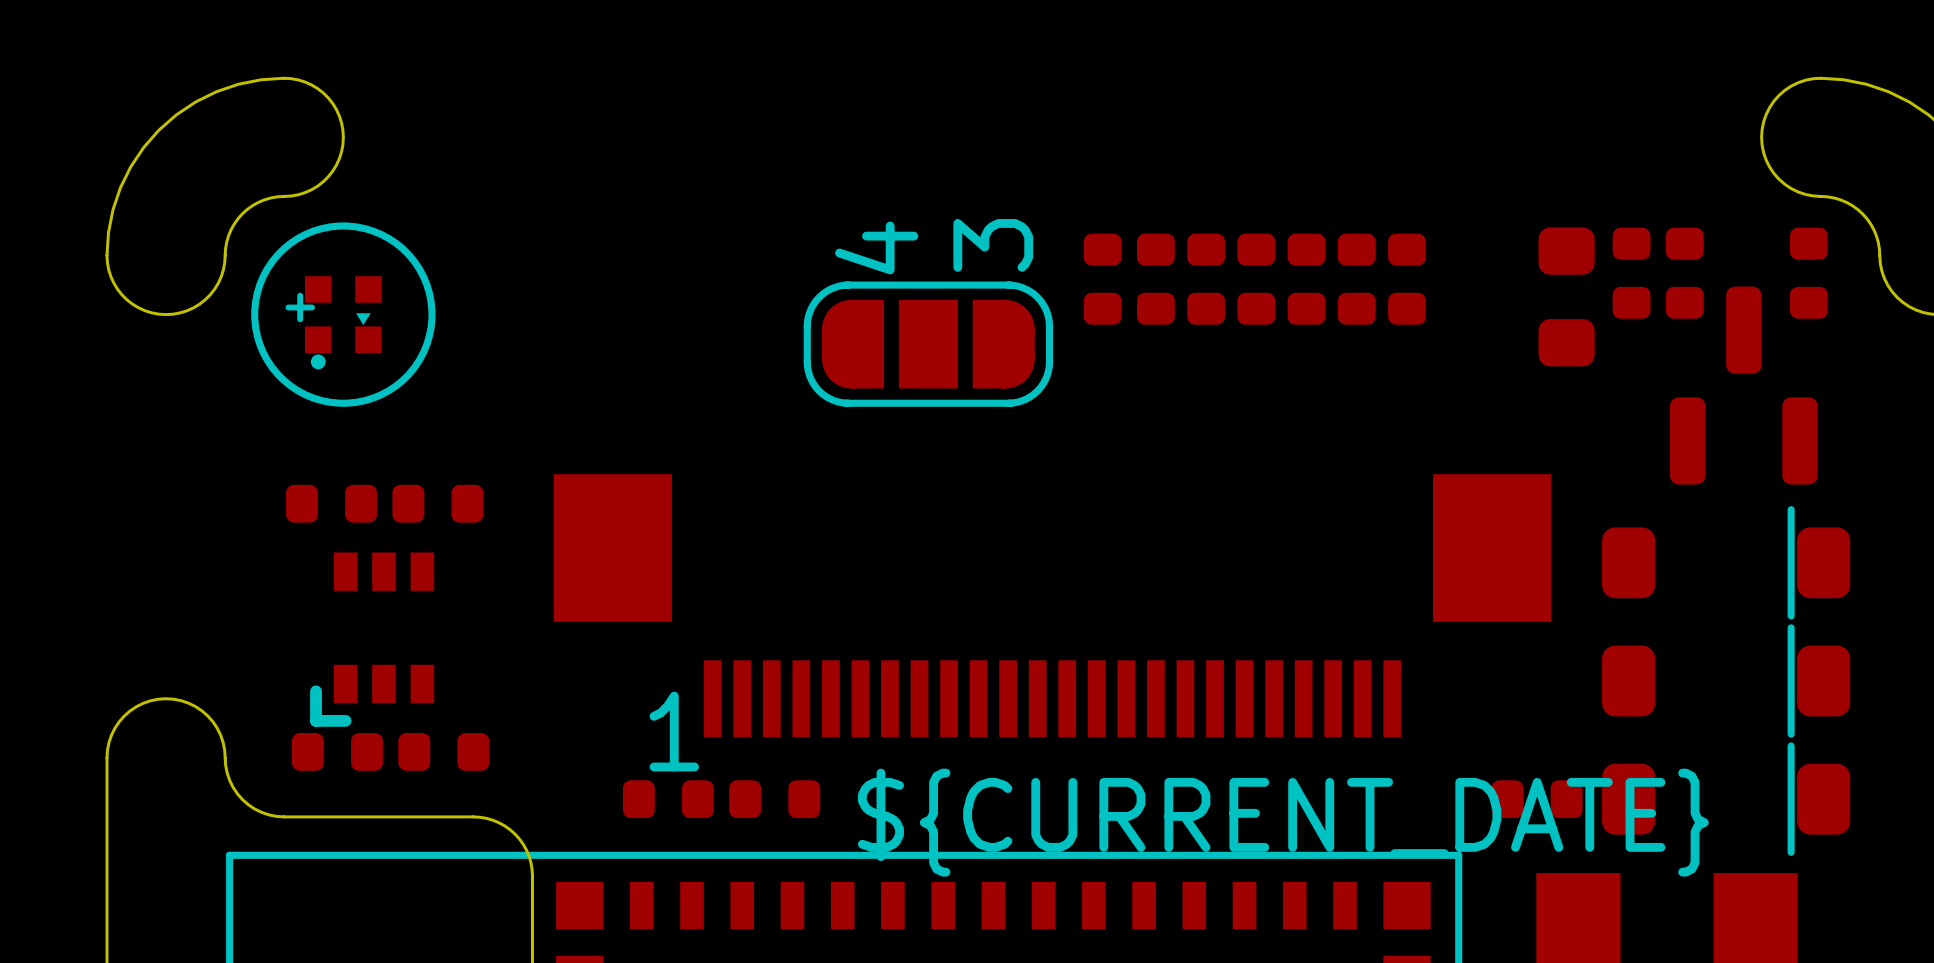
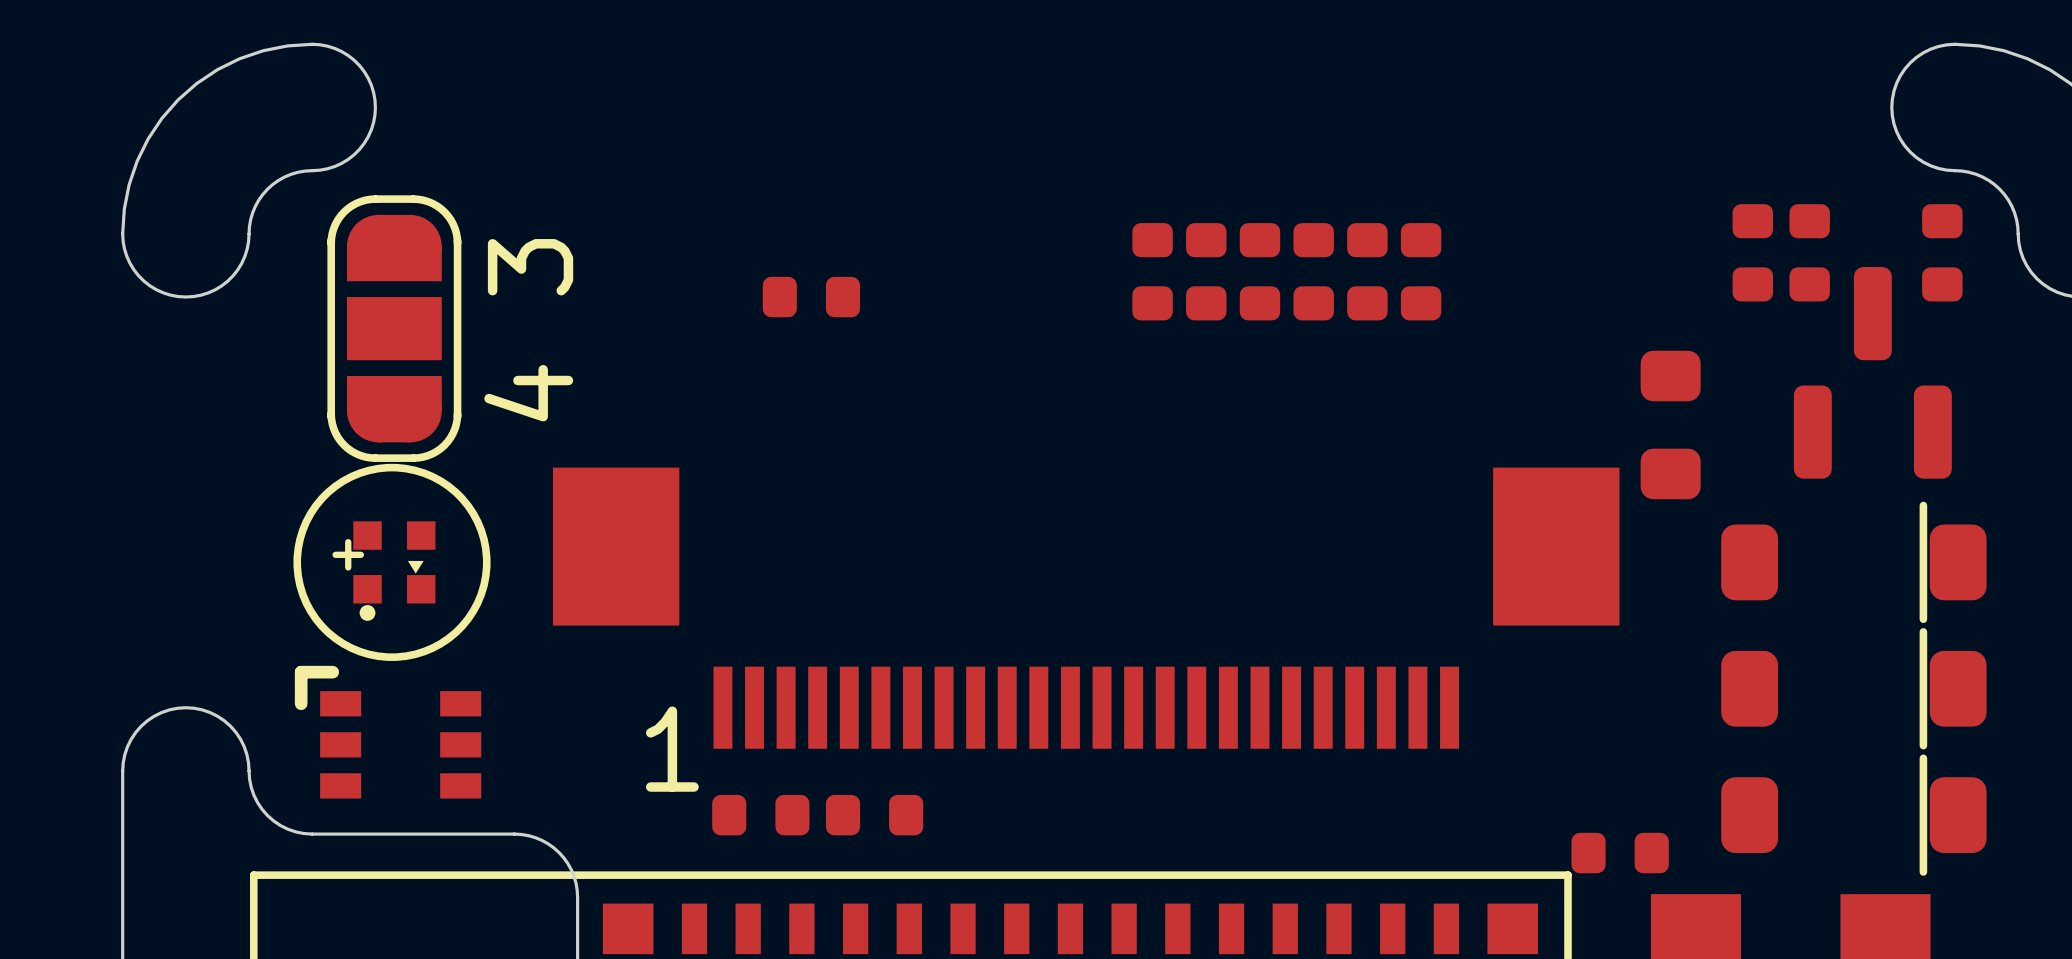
text position: 3 (993, 245) -> 3 (530, 267)
text position: 4 (876, 247) -> 4 (528, 393)
part footprint: [285, 276, 382, 370] -> [327, 195, 462, 462]
part: (1102, 279) -> none
part: (1155, 279) -> none
part: (1206, 279) -> none
part: (1256, 279) -> none
part: (1306, 279) -> none
part: (1356, 279) -> none
part: (1407, 279) -> none
part: none -> (1152, 271)
part: none -> (1206, 271)
part: none -> (1259, 271)
part: none -> (1313, 271)
part: none -> (1367, 271)
part: none -> (1421, 271)
part position: (1566, 296) -> (1670, 424)
drawing position: (343, 314) -> (392, 562)
part: none -> (811, 297)
part: (928, 344) -> none
part: (331, 503) -> none
part: (437, 503) -> none
part: none -> (383, 571)
part position: (1052, 605) -> (1086, 608)
part: (372, 639) -> none
text position: 1 (674, 731) -> 1 (672, 749)
part footprint: [291, 732, 383, 771] -> [294, 665, 482, 799]
part: (443, 751) -> none
part: (668, 799) -> none
part: none -> (760, 815)
part: (774, 799) -> none
part: none -> (874, 815)
part position: (1537, 799) -> (1620, 853)
text: ${CURRENT_DATE} (1283, 822) -> none

